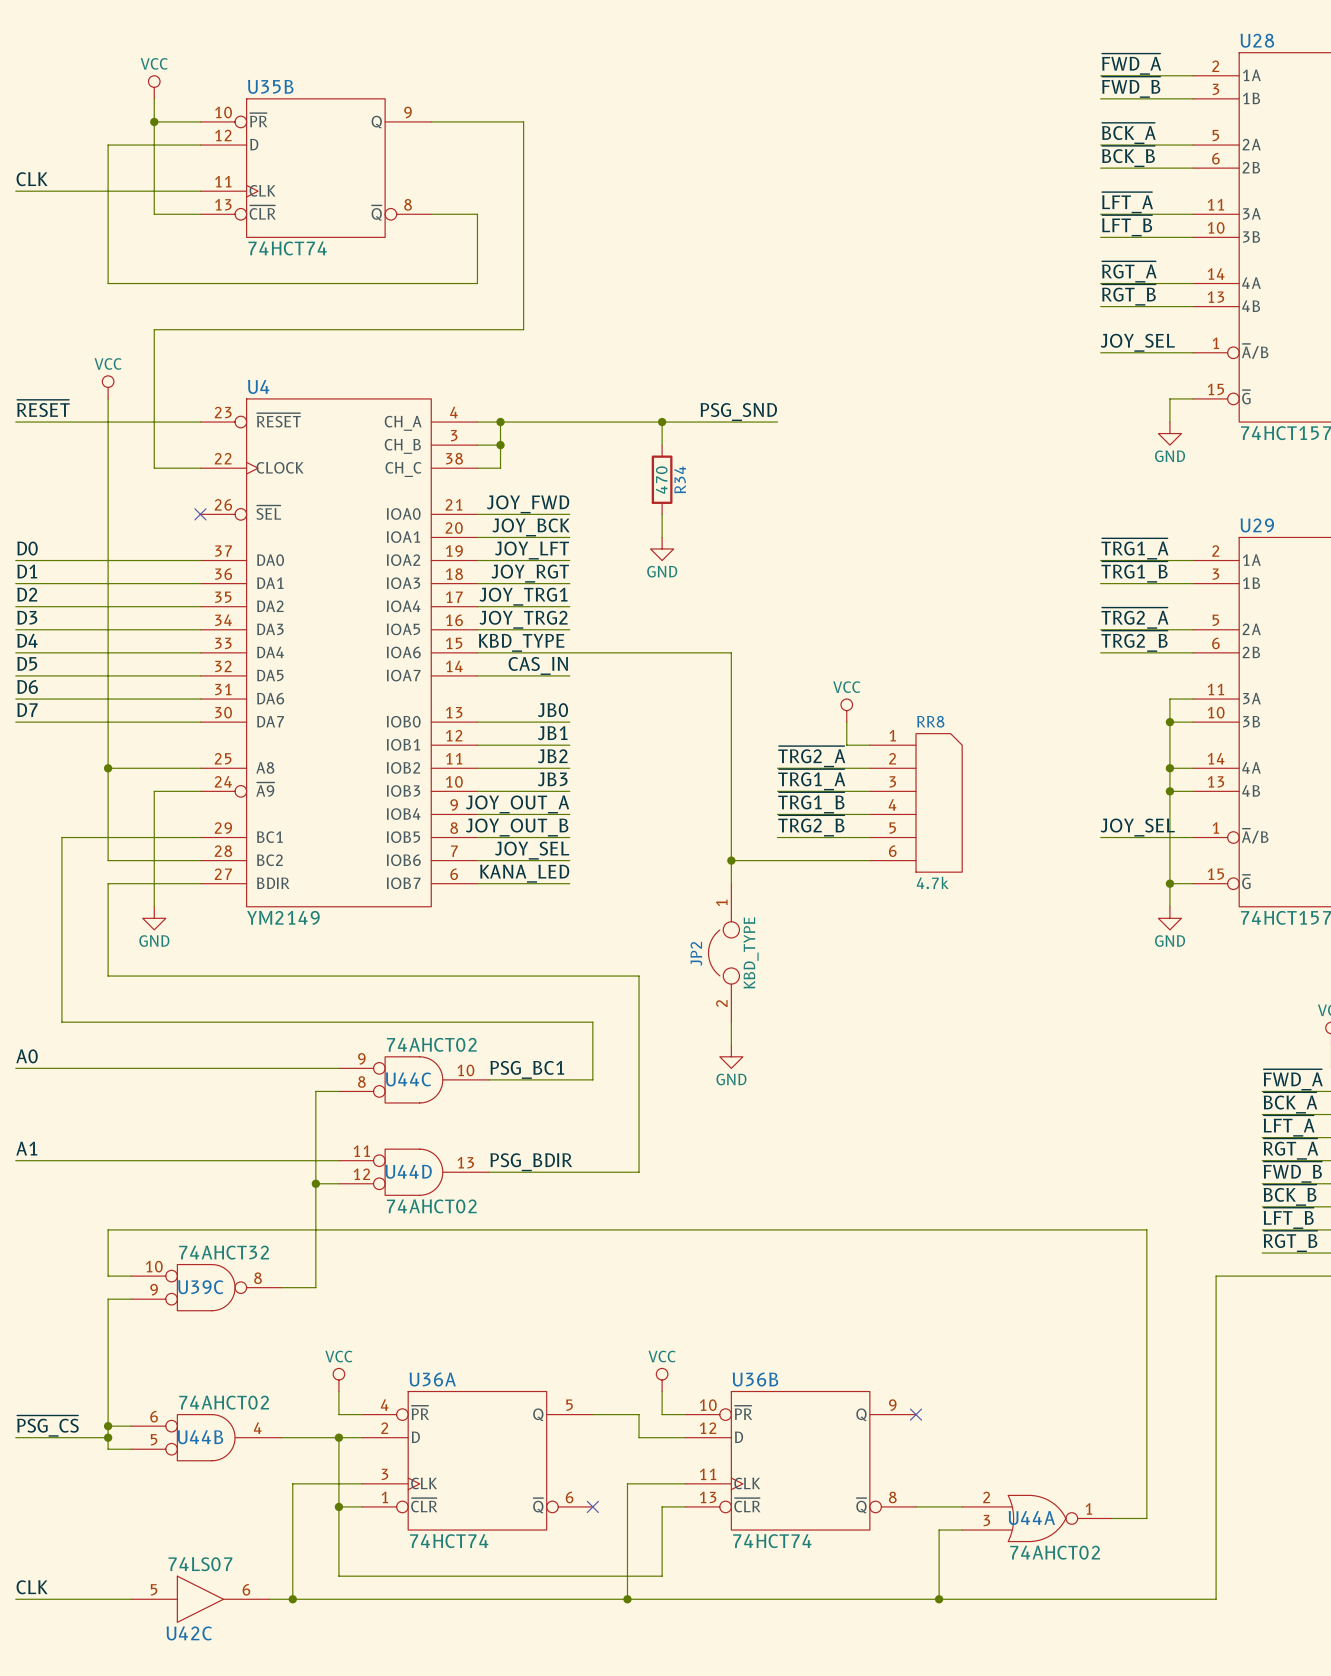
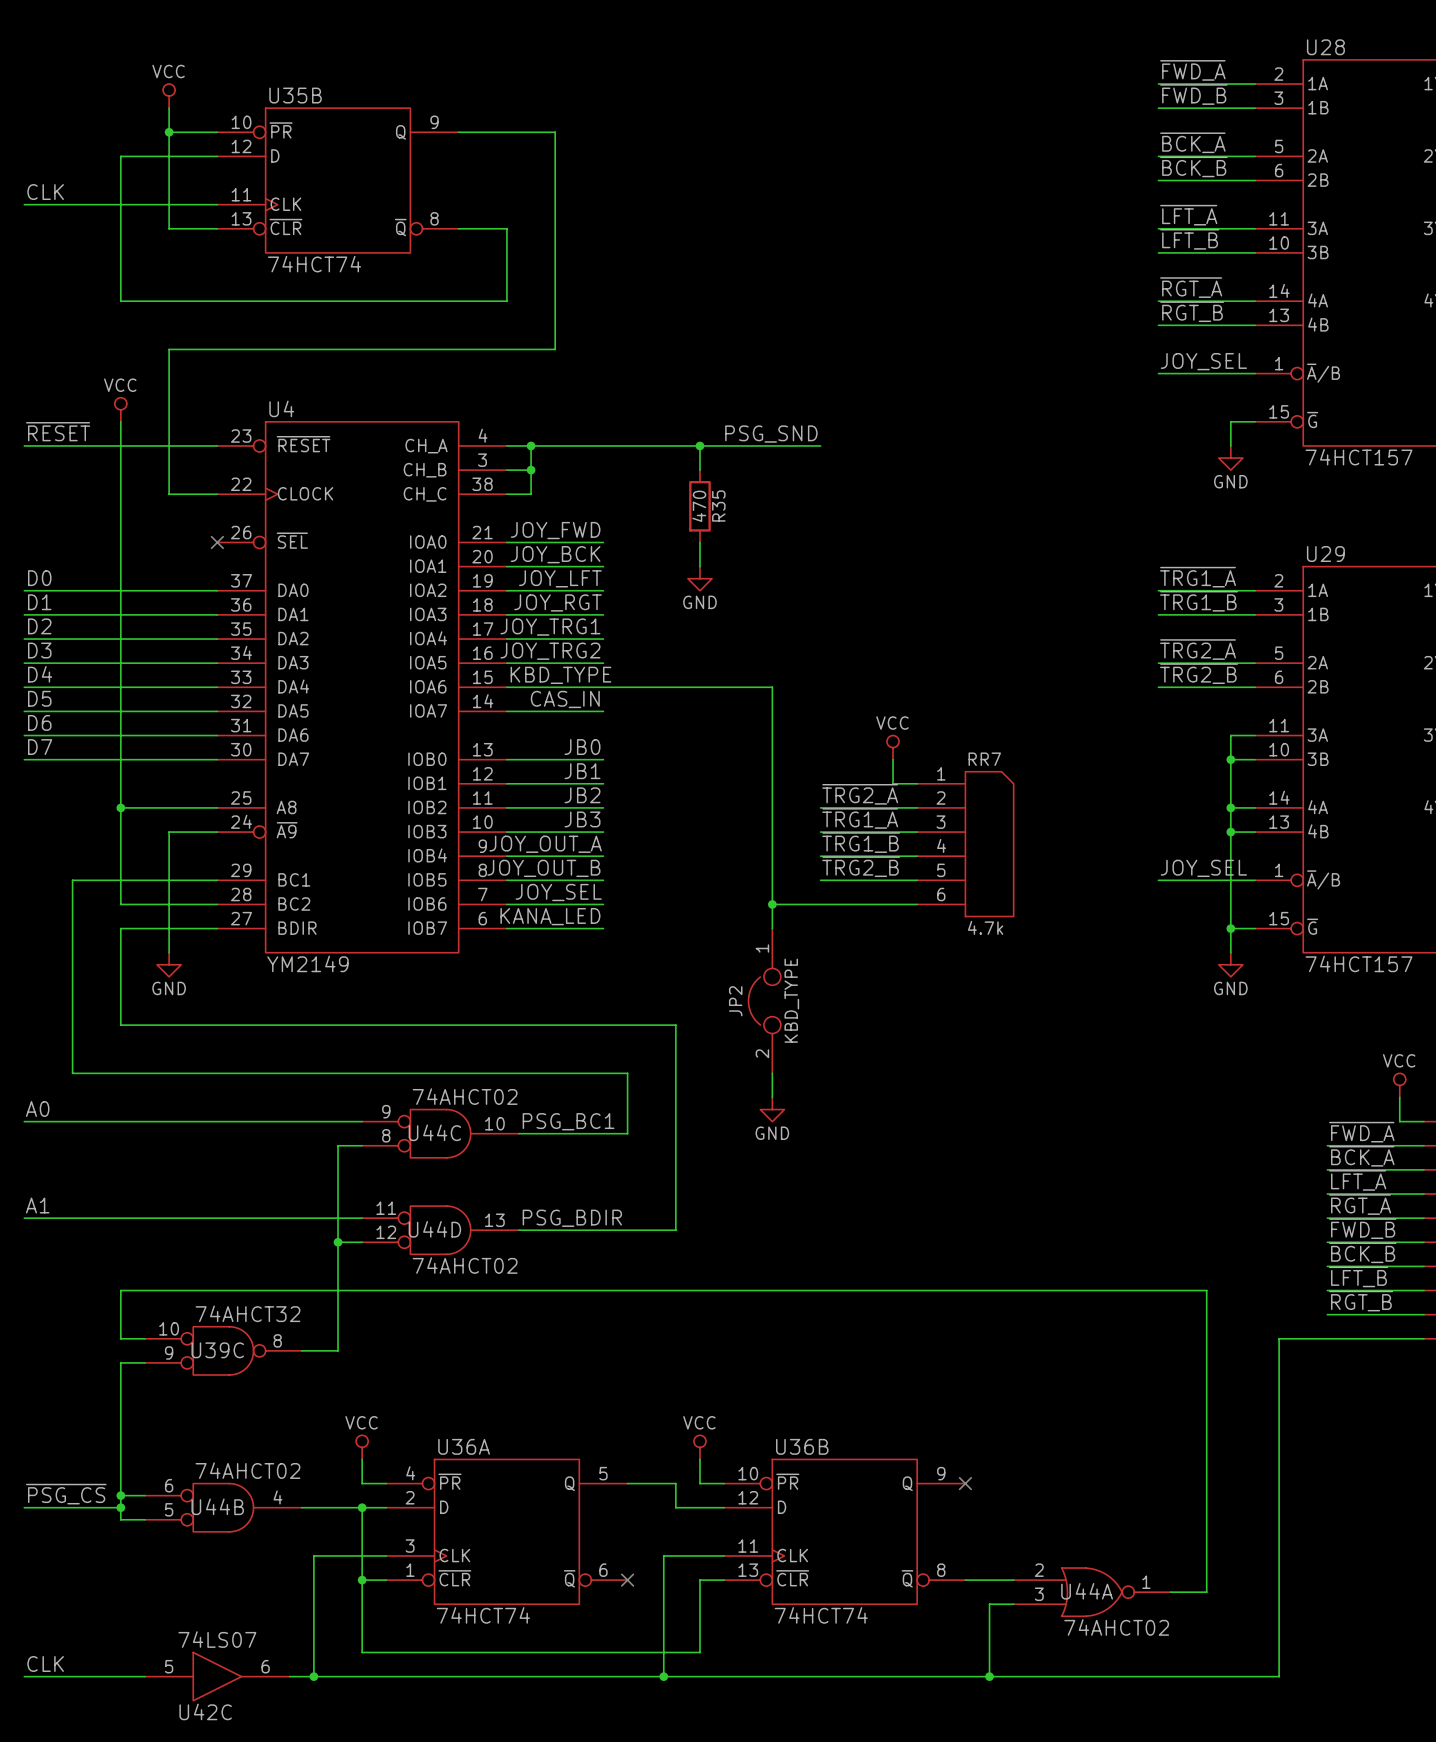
R34 name: R34 (680, 479) -> R35 (718, 506)
RR8 name: RR8 (930, 721) -> RR7 (984, 759)

